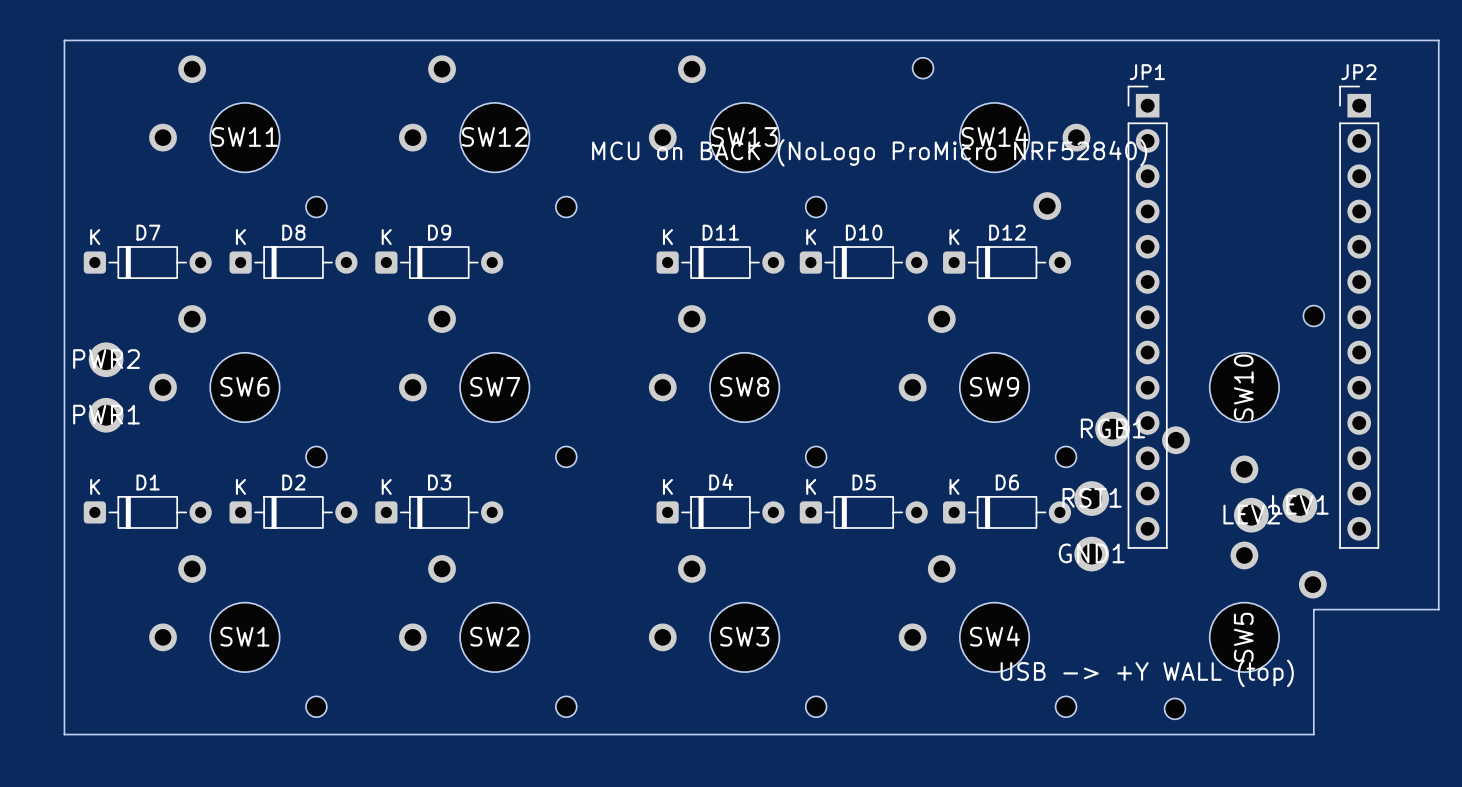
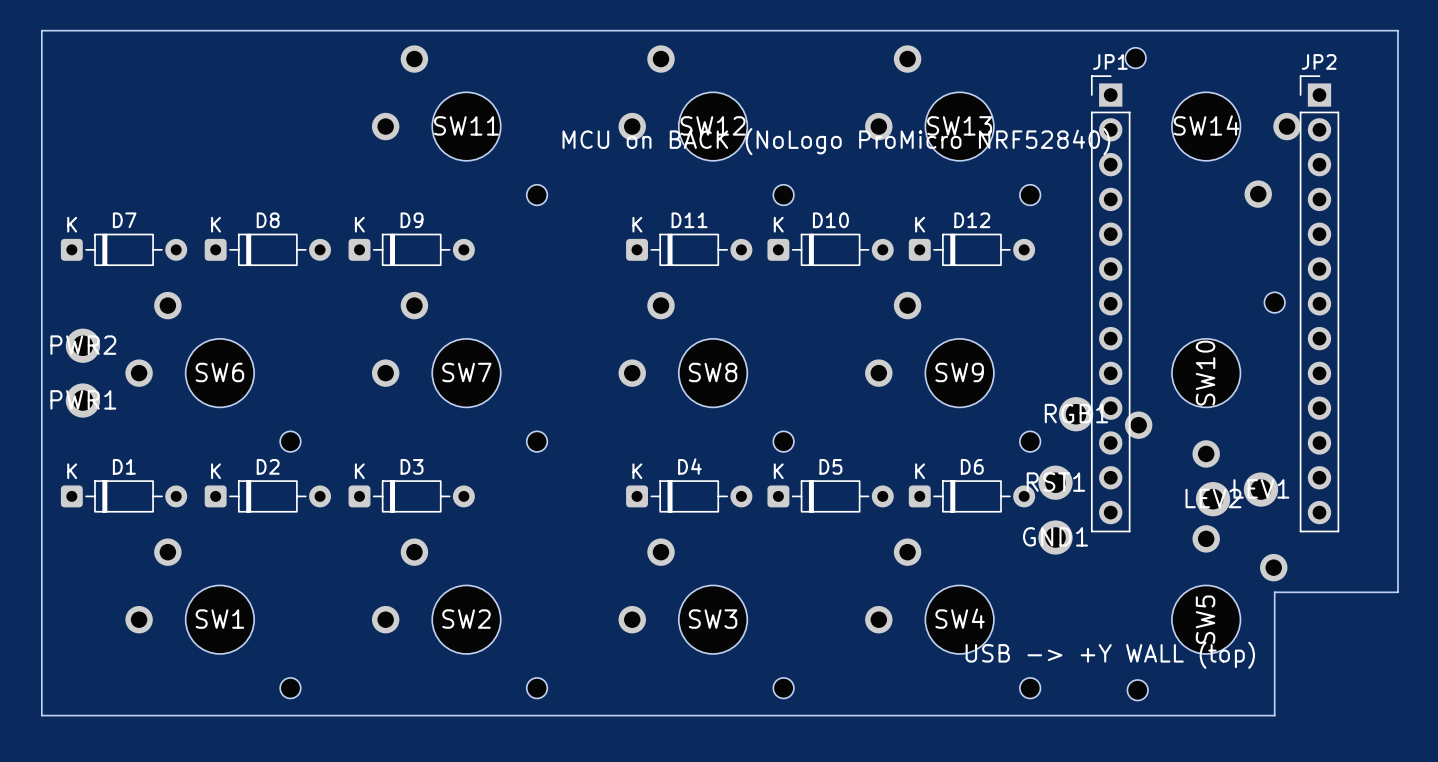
SW11: (237, 136) -> none
SW12 name: SW12 (494, 136) -> SW11 (466, 125)
SW13 name: SW13 (744, 136) -> SW12 (713, 125)
SW13: none -> (952, 125)
SW14 position: (1001, 138) -> (1213, 127)

